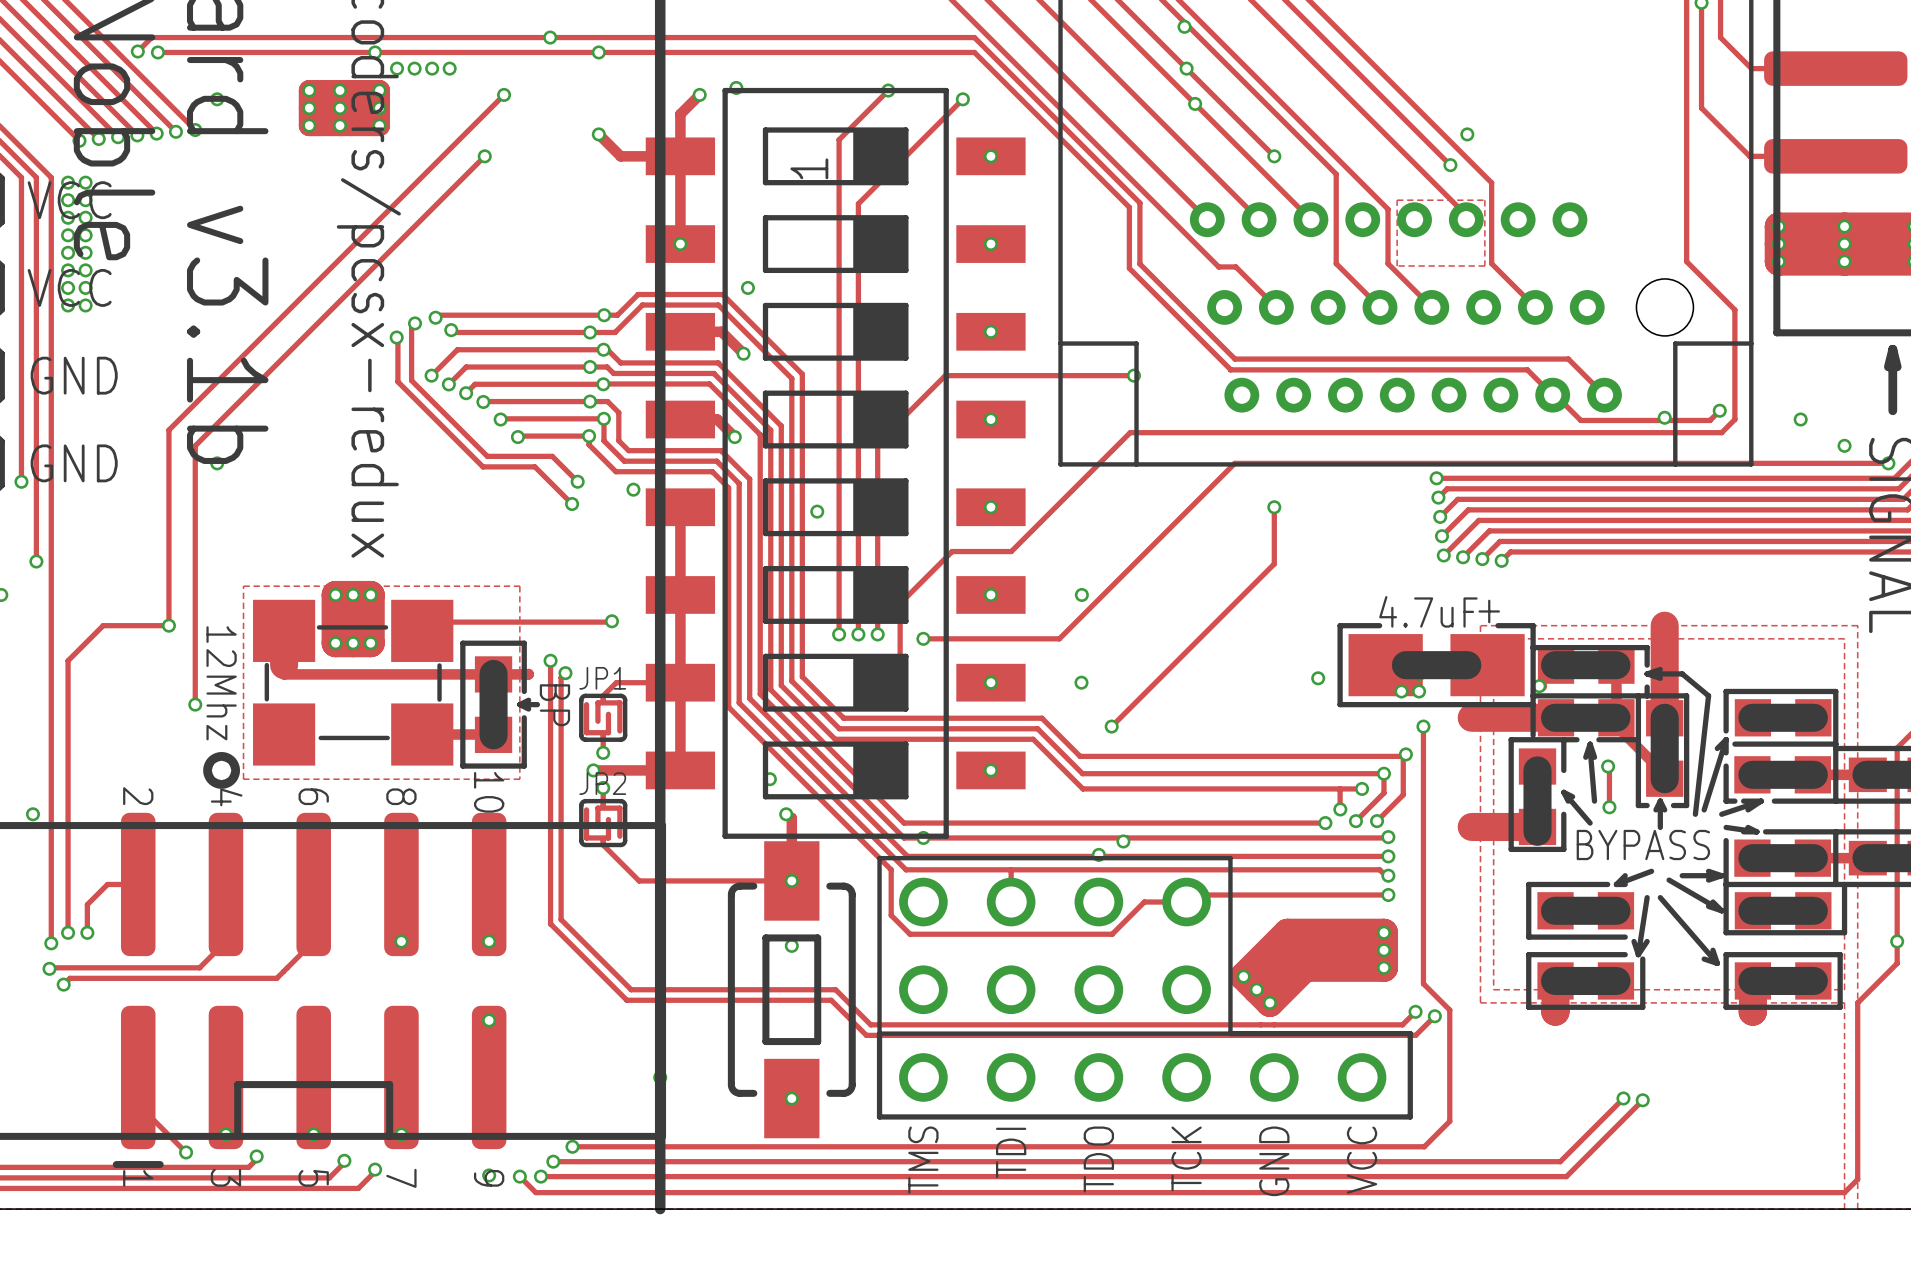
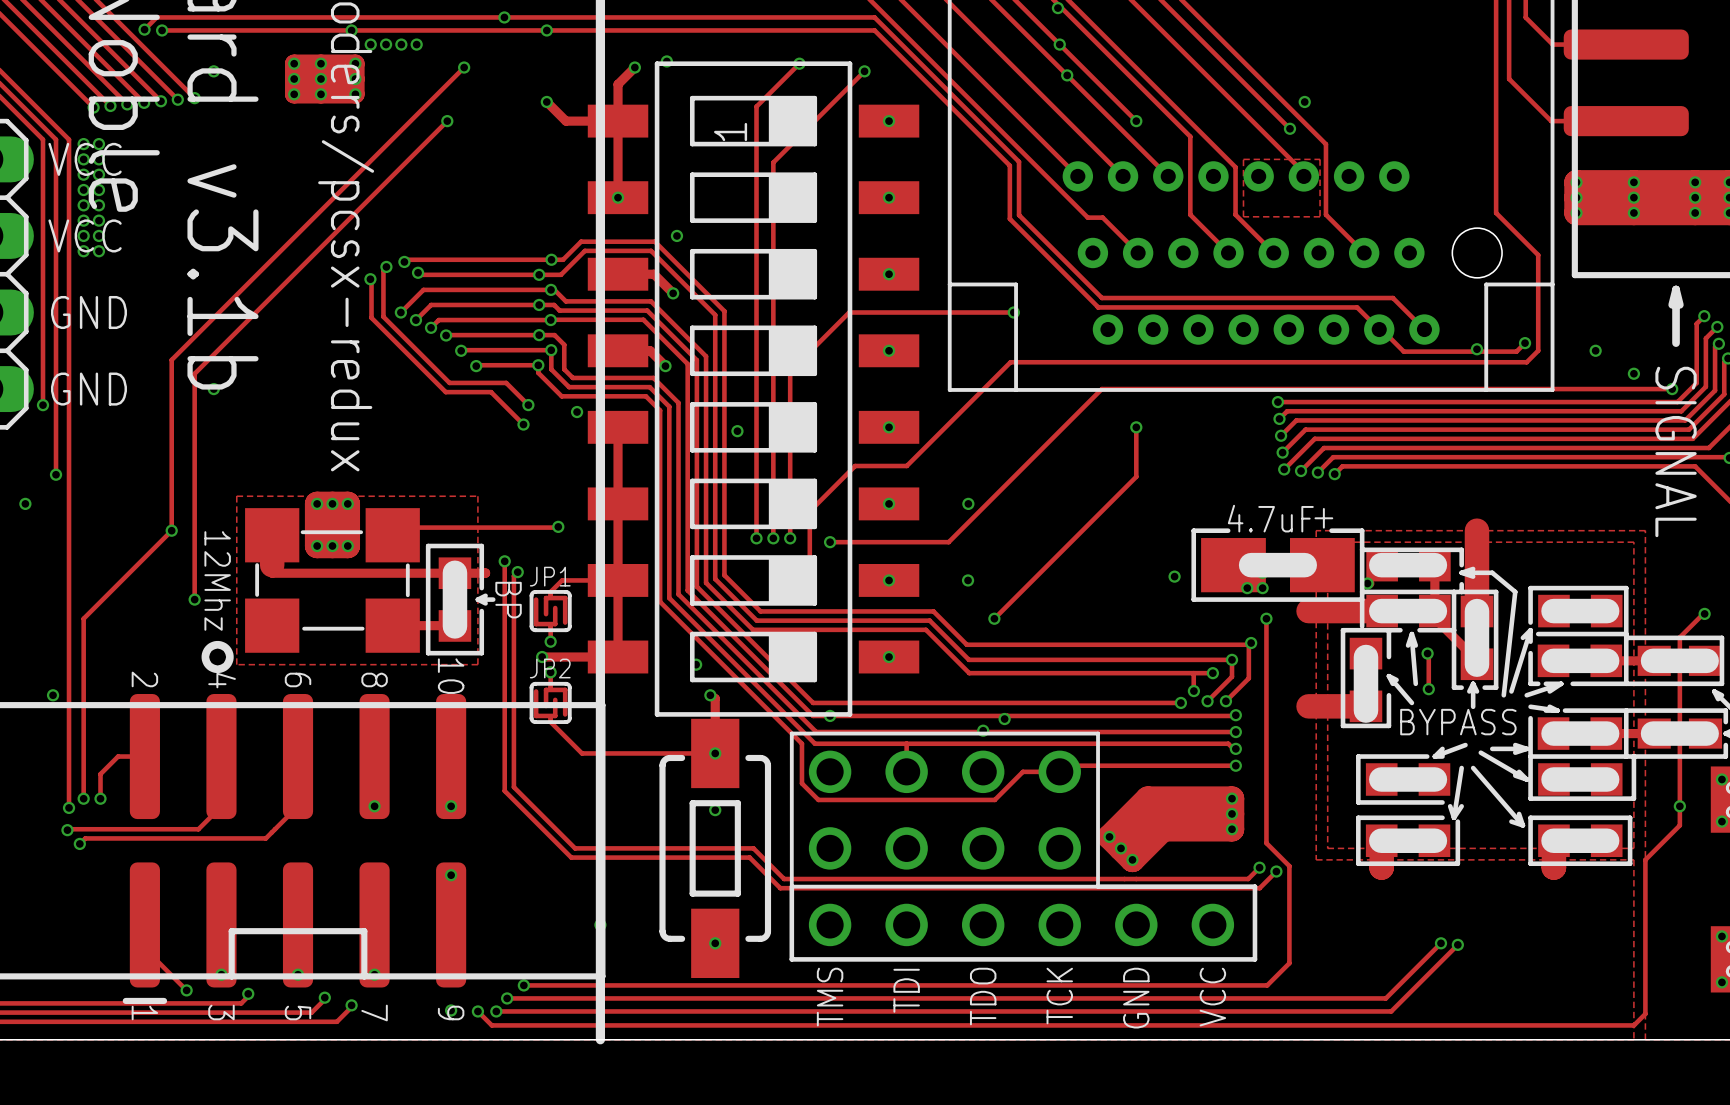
track: (168, 625) (103, 625) (68, 660) (68, 726) -> (171, 530) (83, 618)

